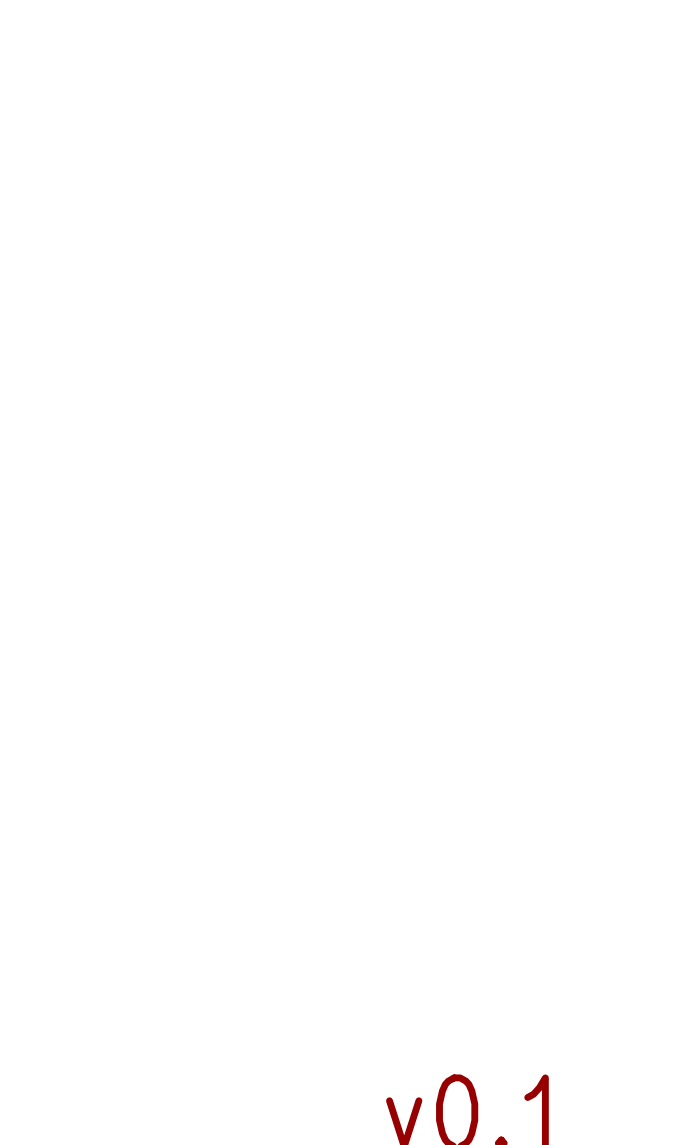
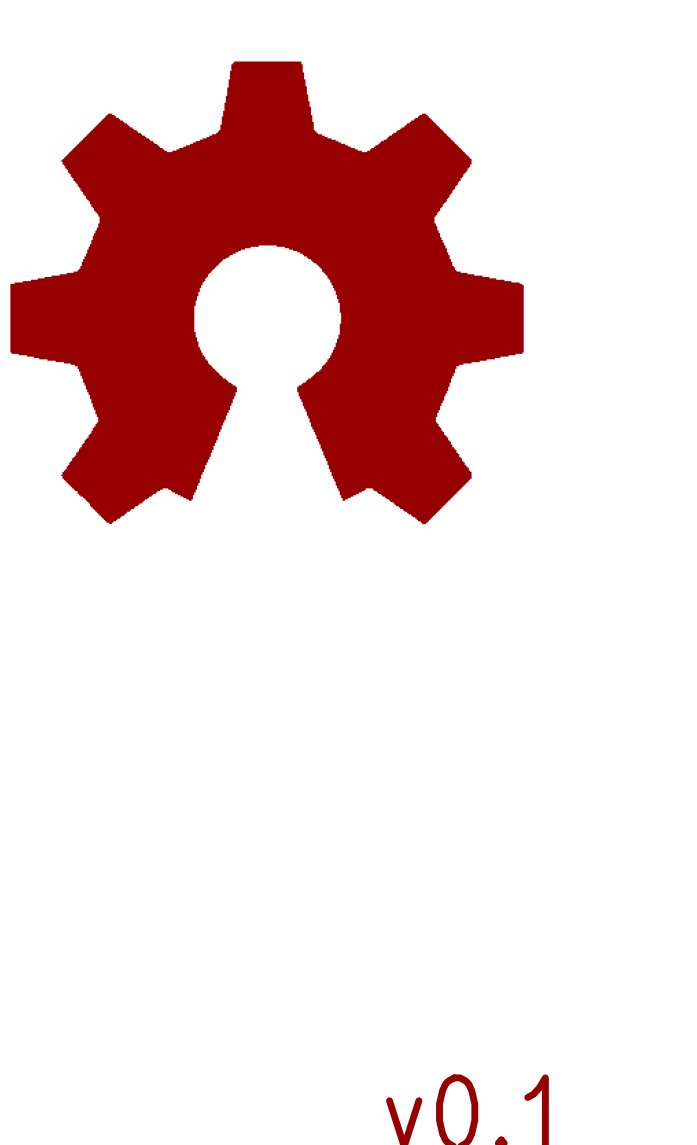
part: none -> (267, 292)

